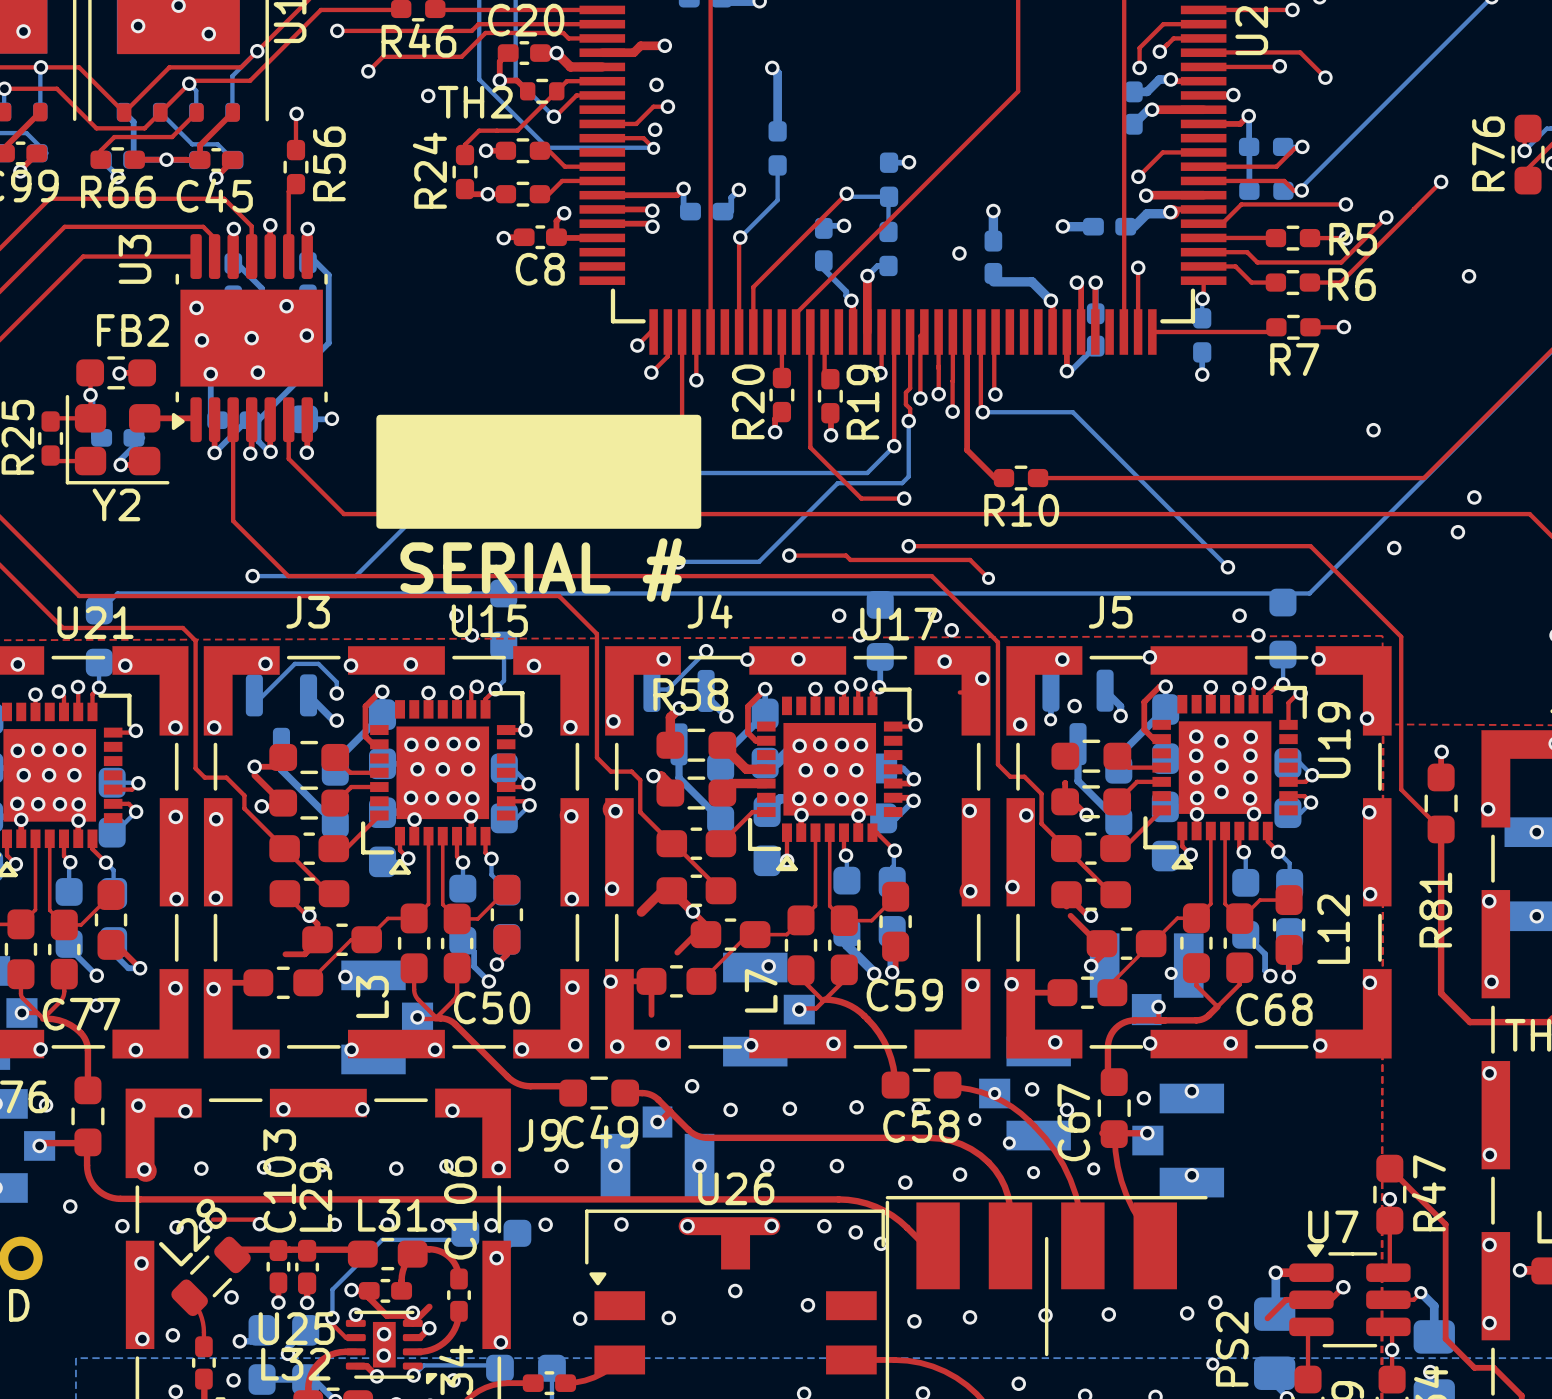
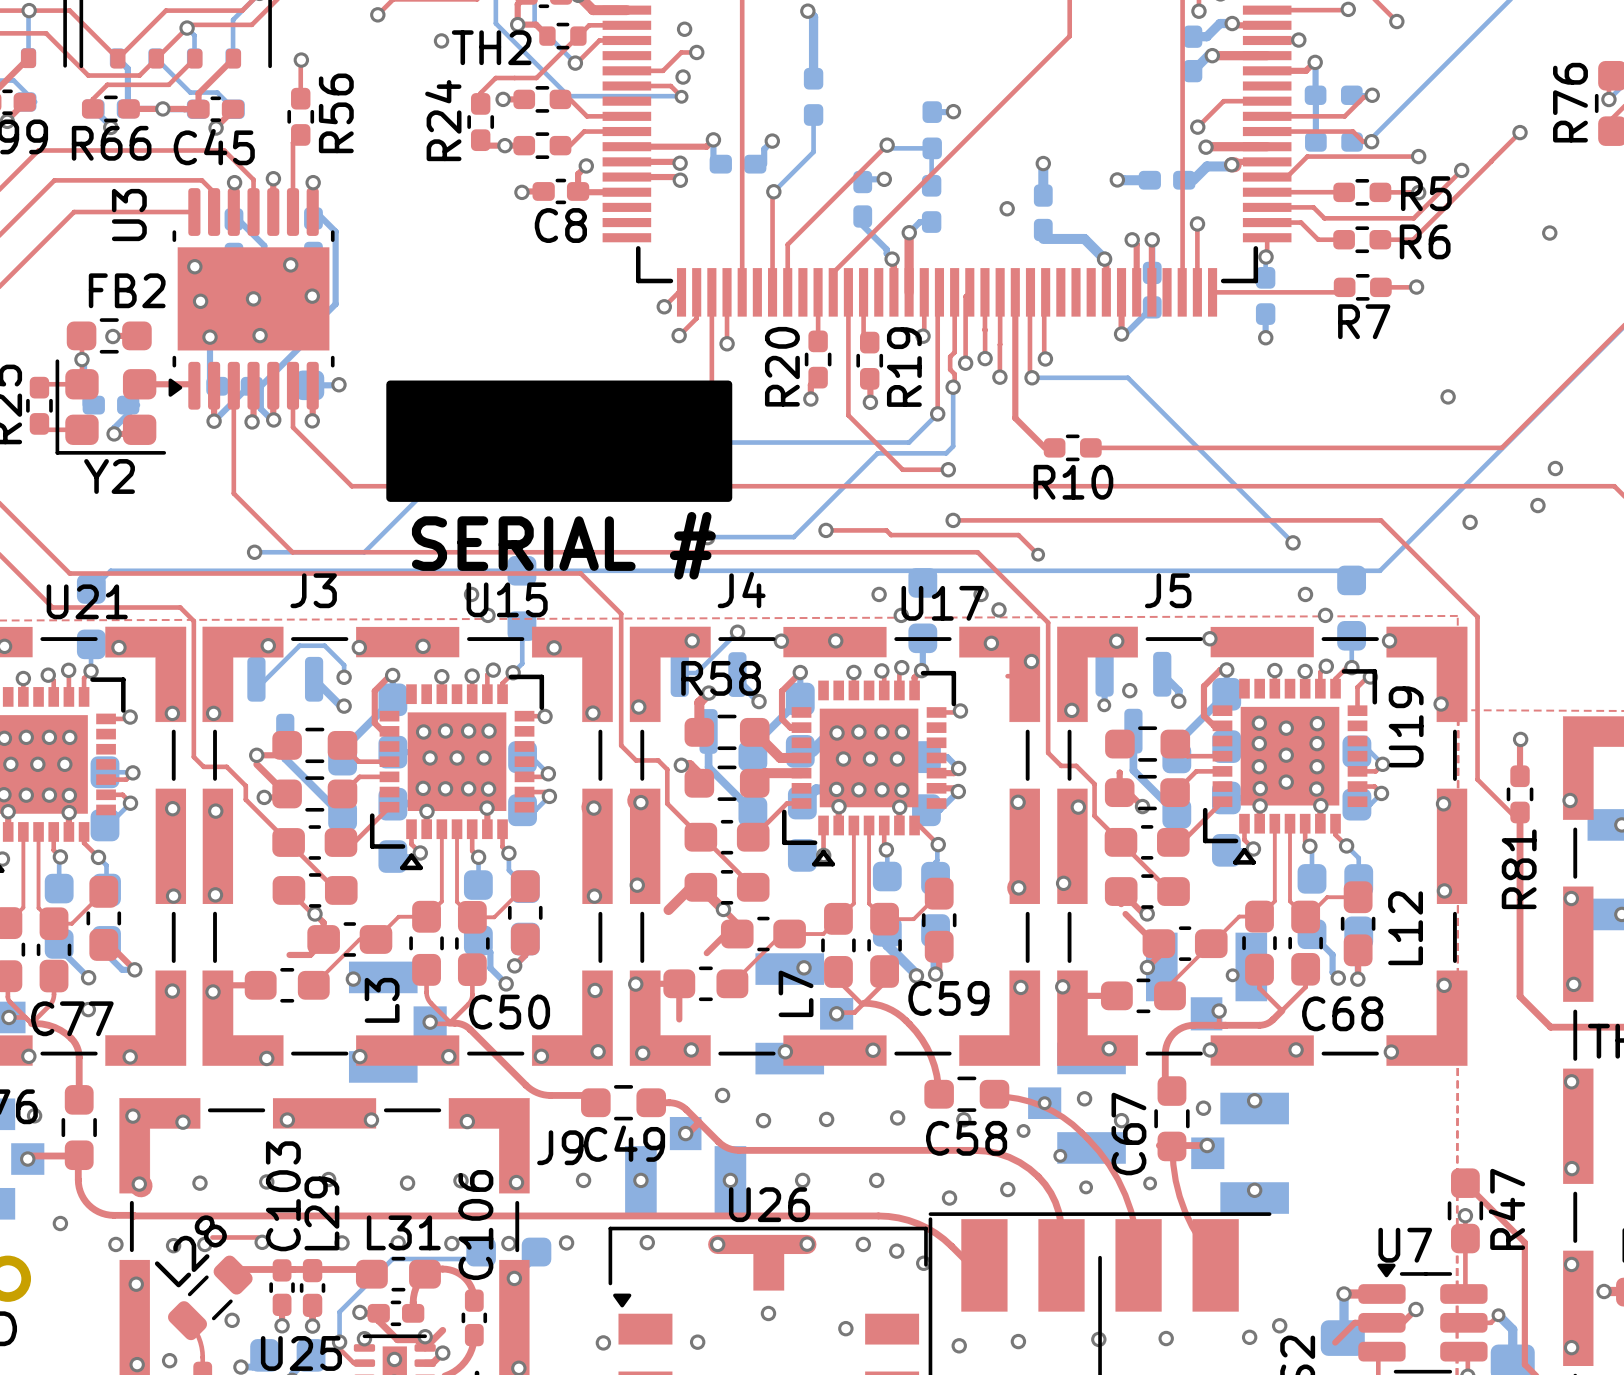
R81 footprint: [1424, 763, 1458, 844] -> [1506, 765, 1534, 824]
R81 name position: R81 (1435, 910) -> R81 (1519, 869)

